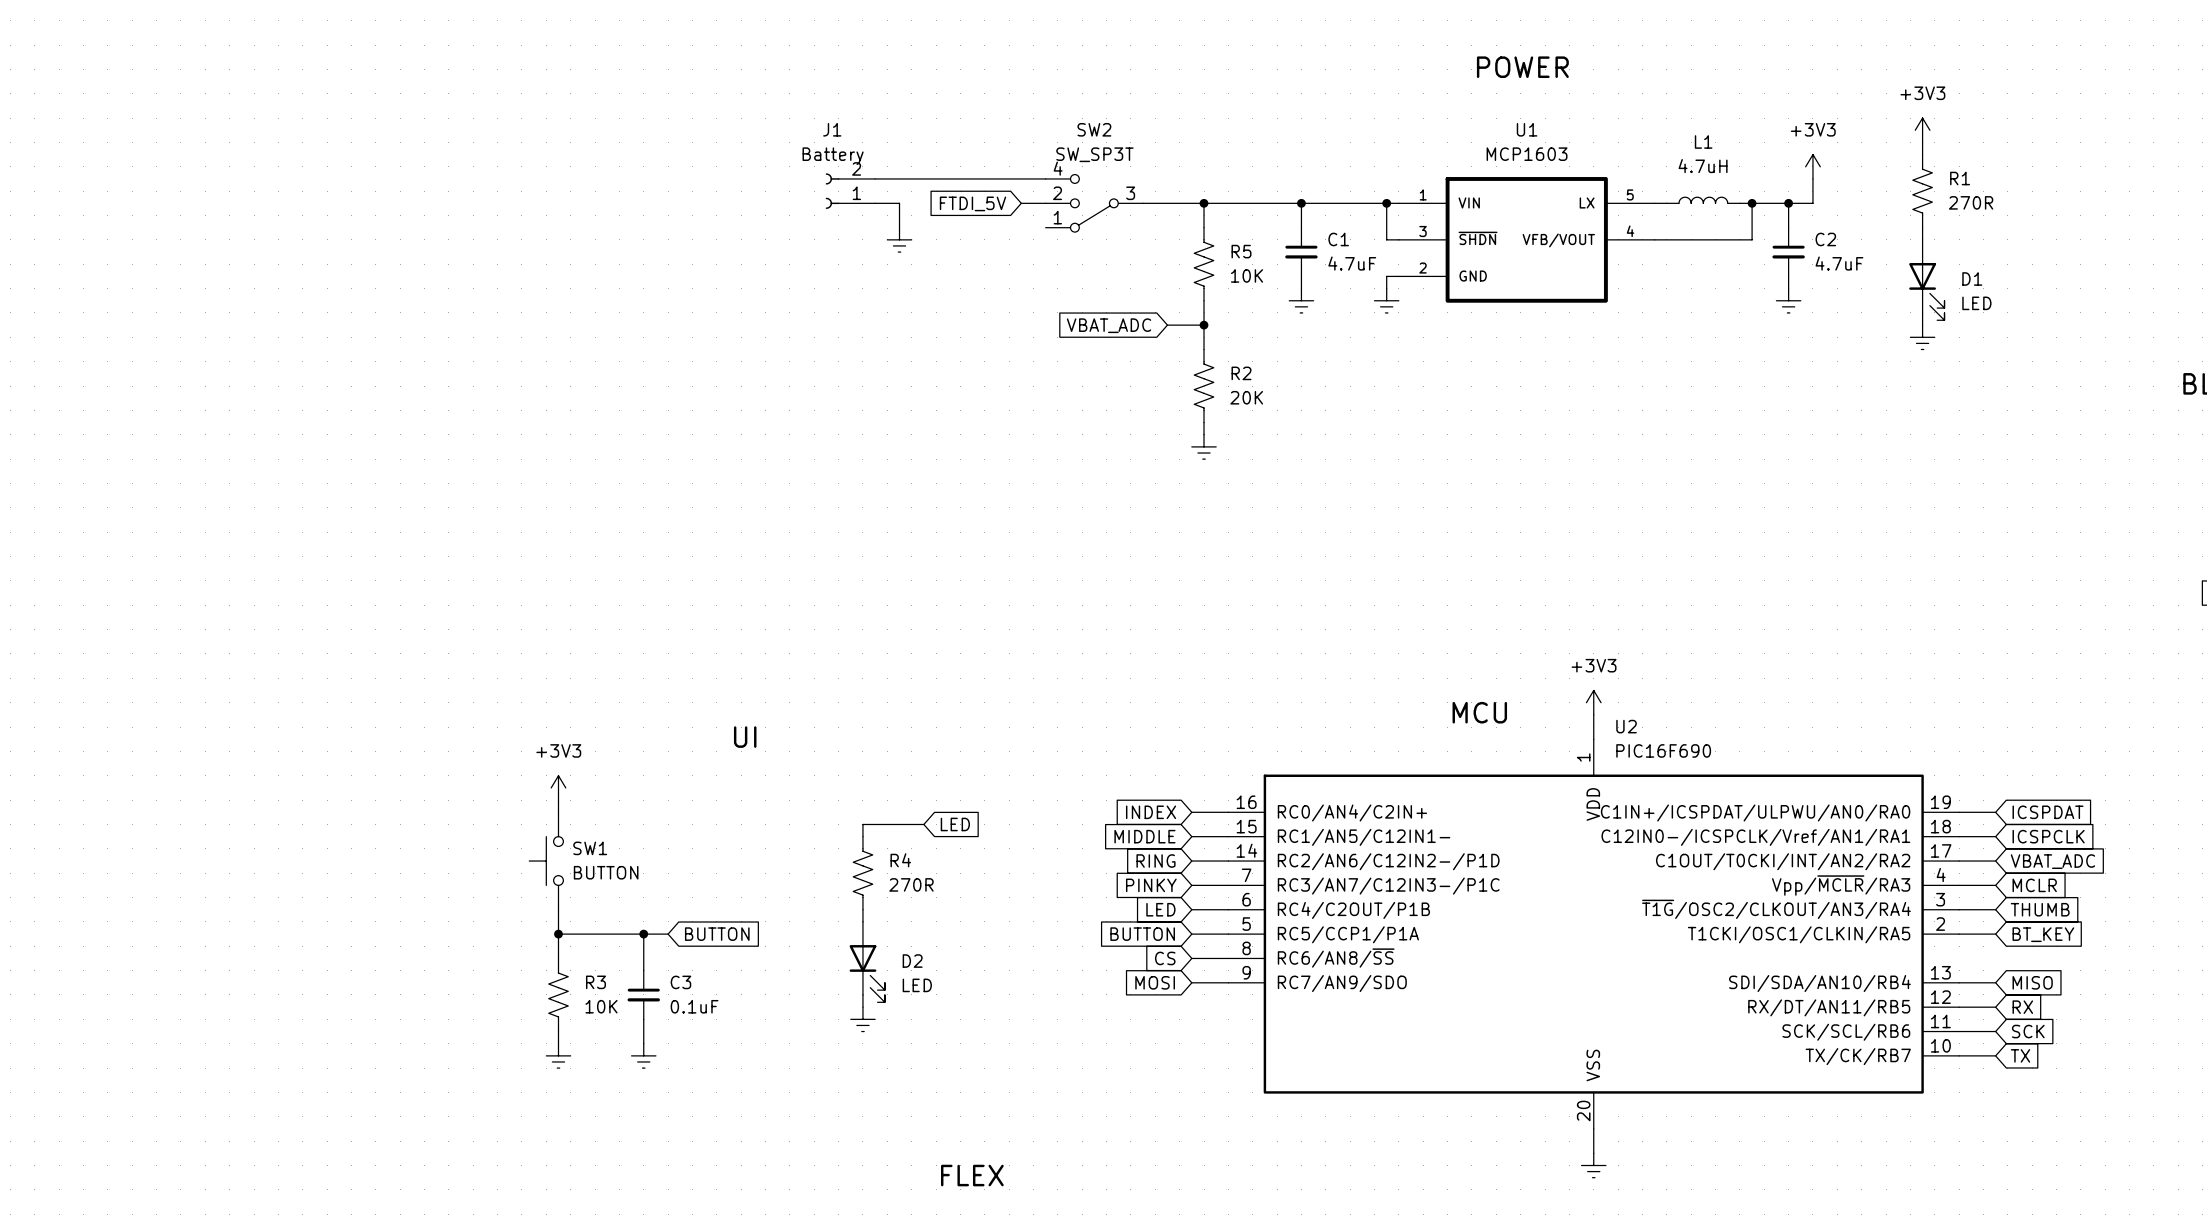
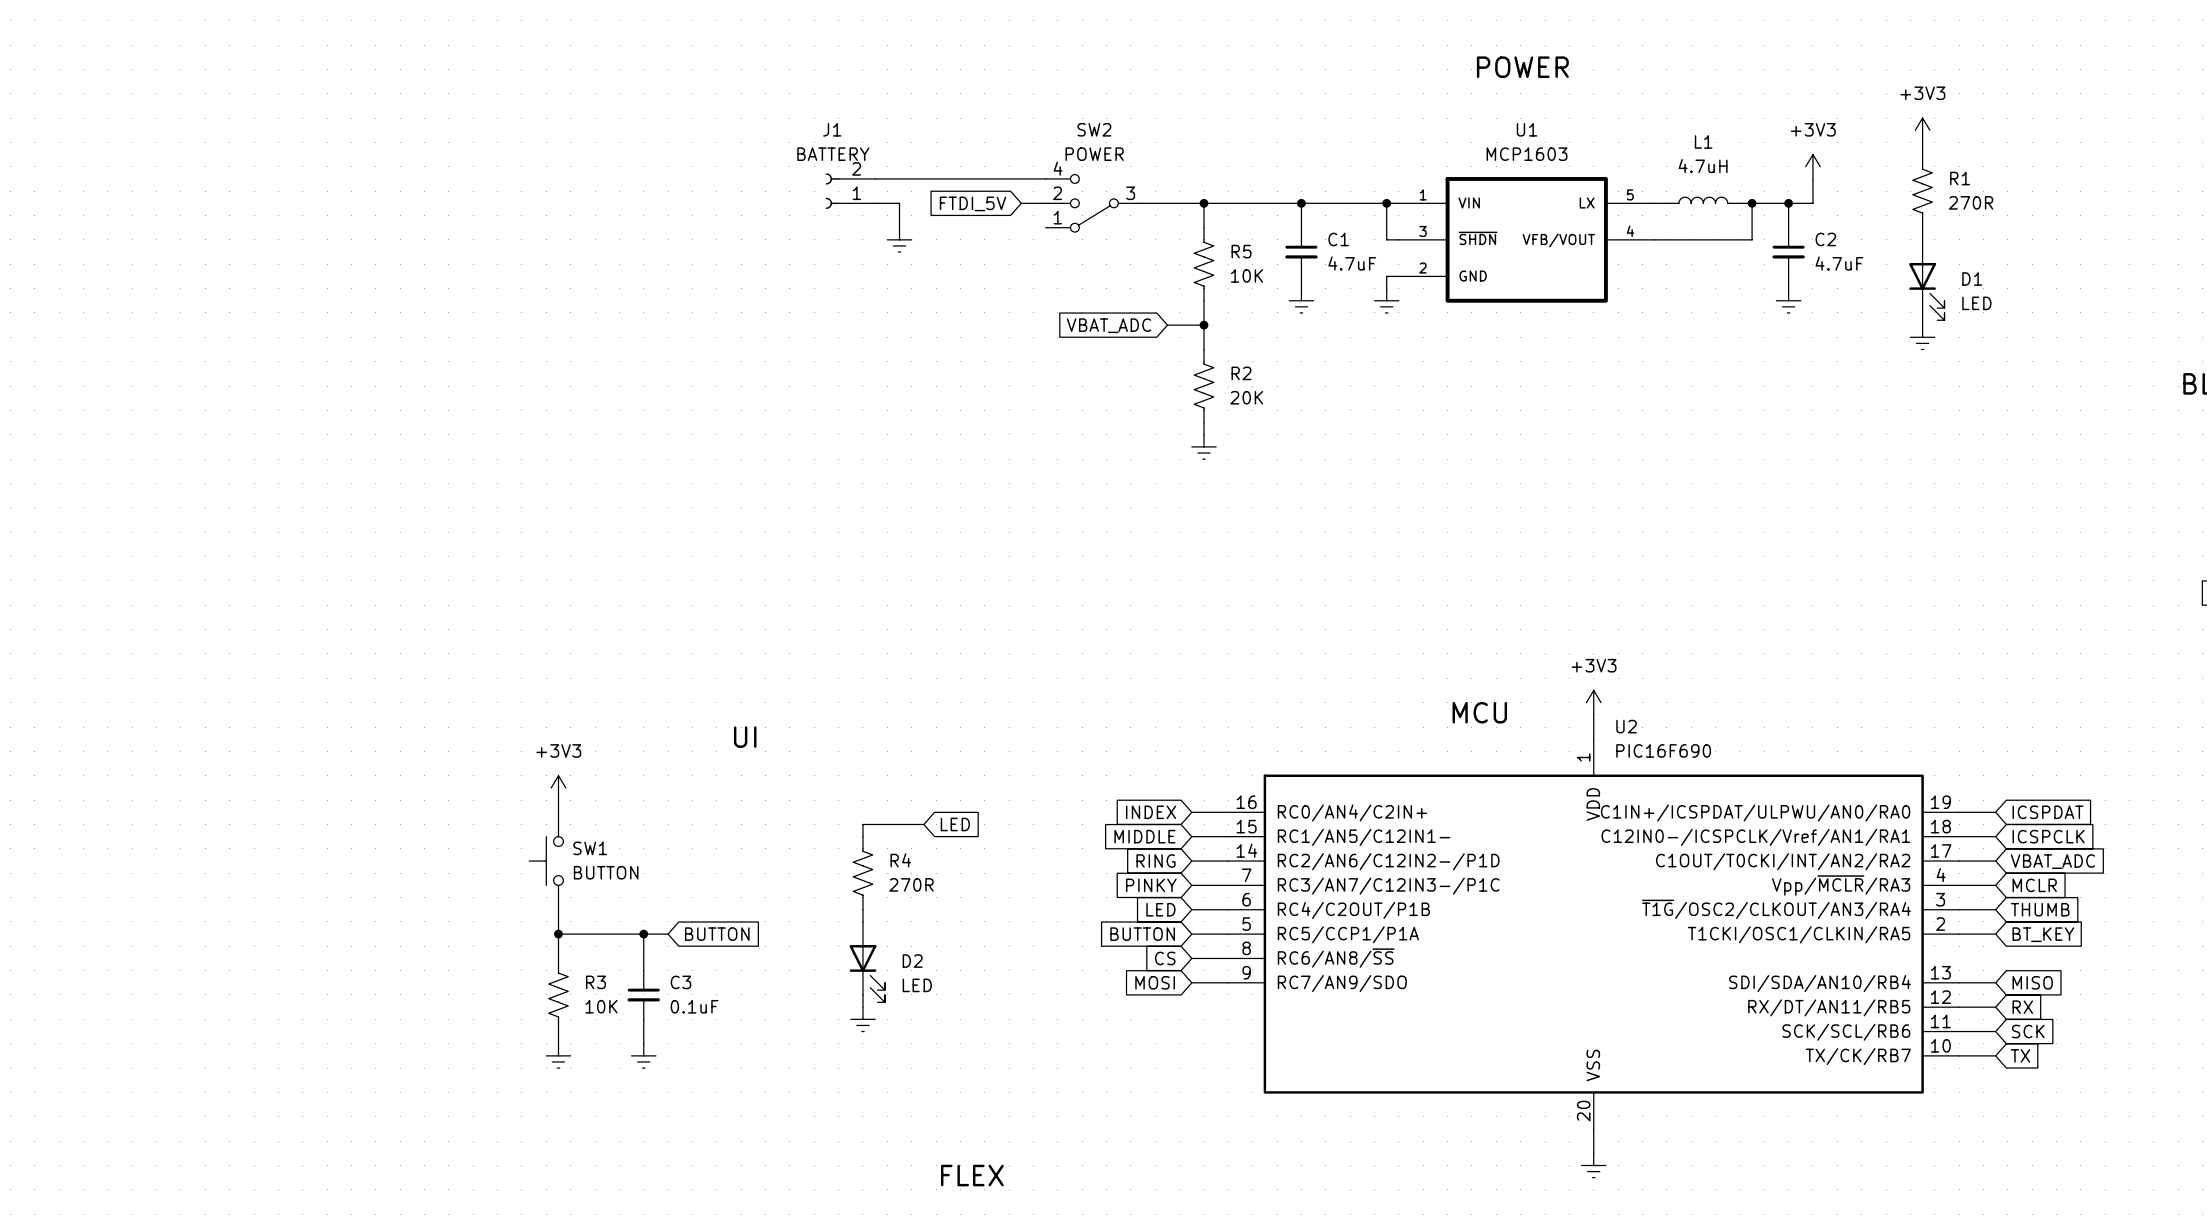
SW2 value: SW_SP3T (1094, 154) -> POWER (1094, 154)
J1 value: Battery (833, 156) -> BATTERY (833, 154)

